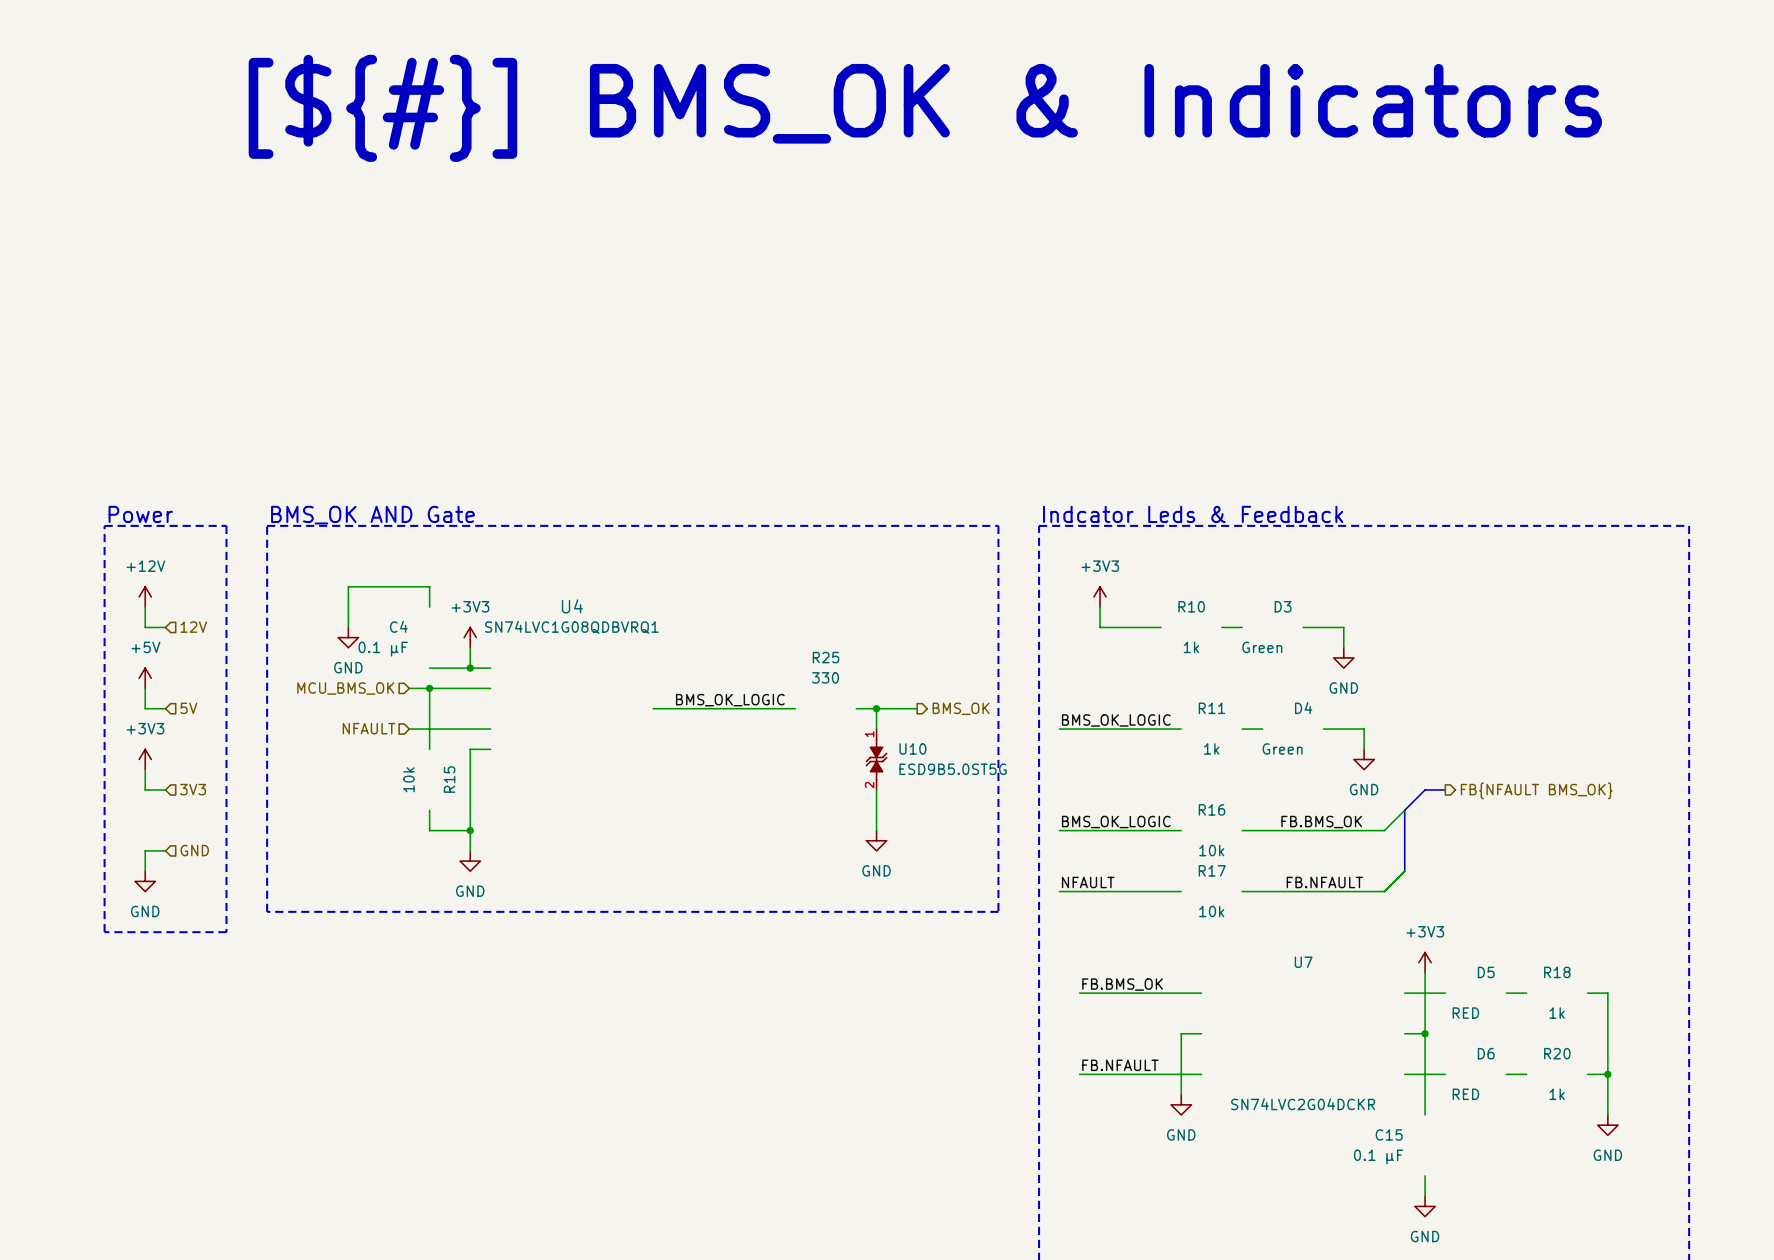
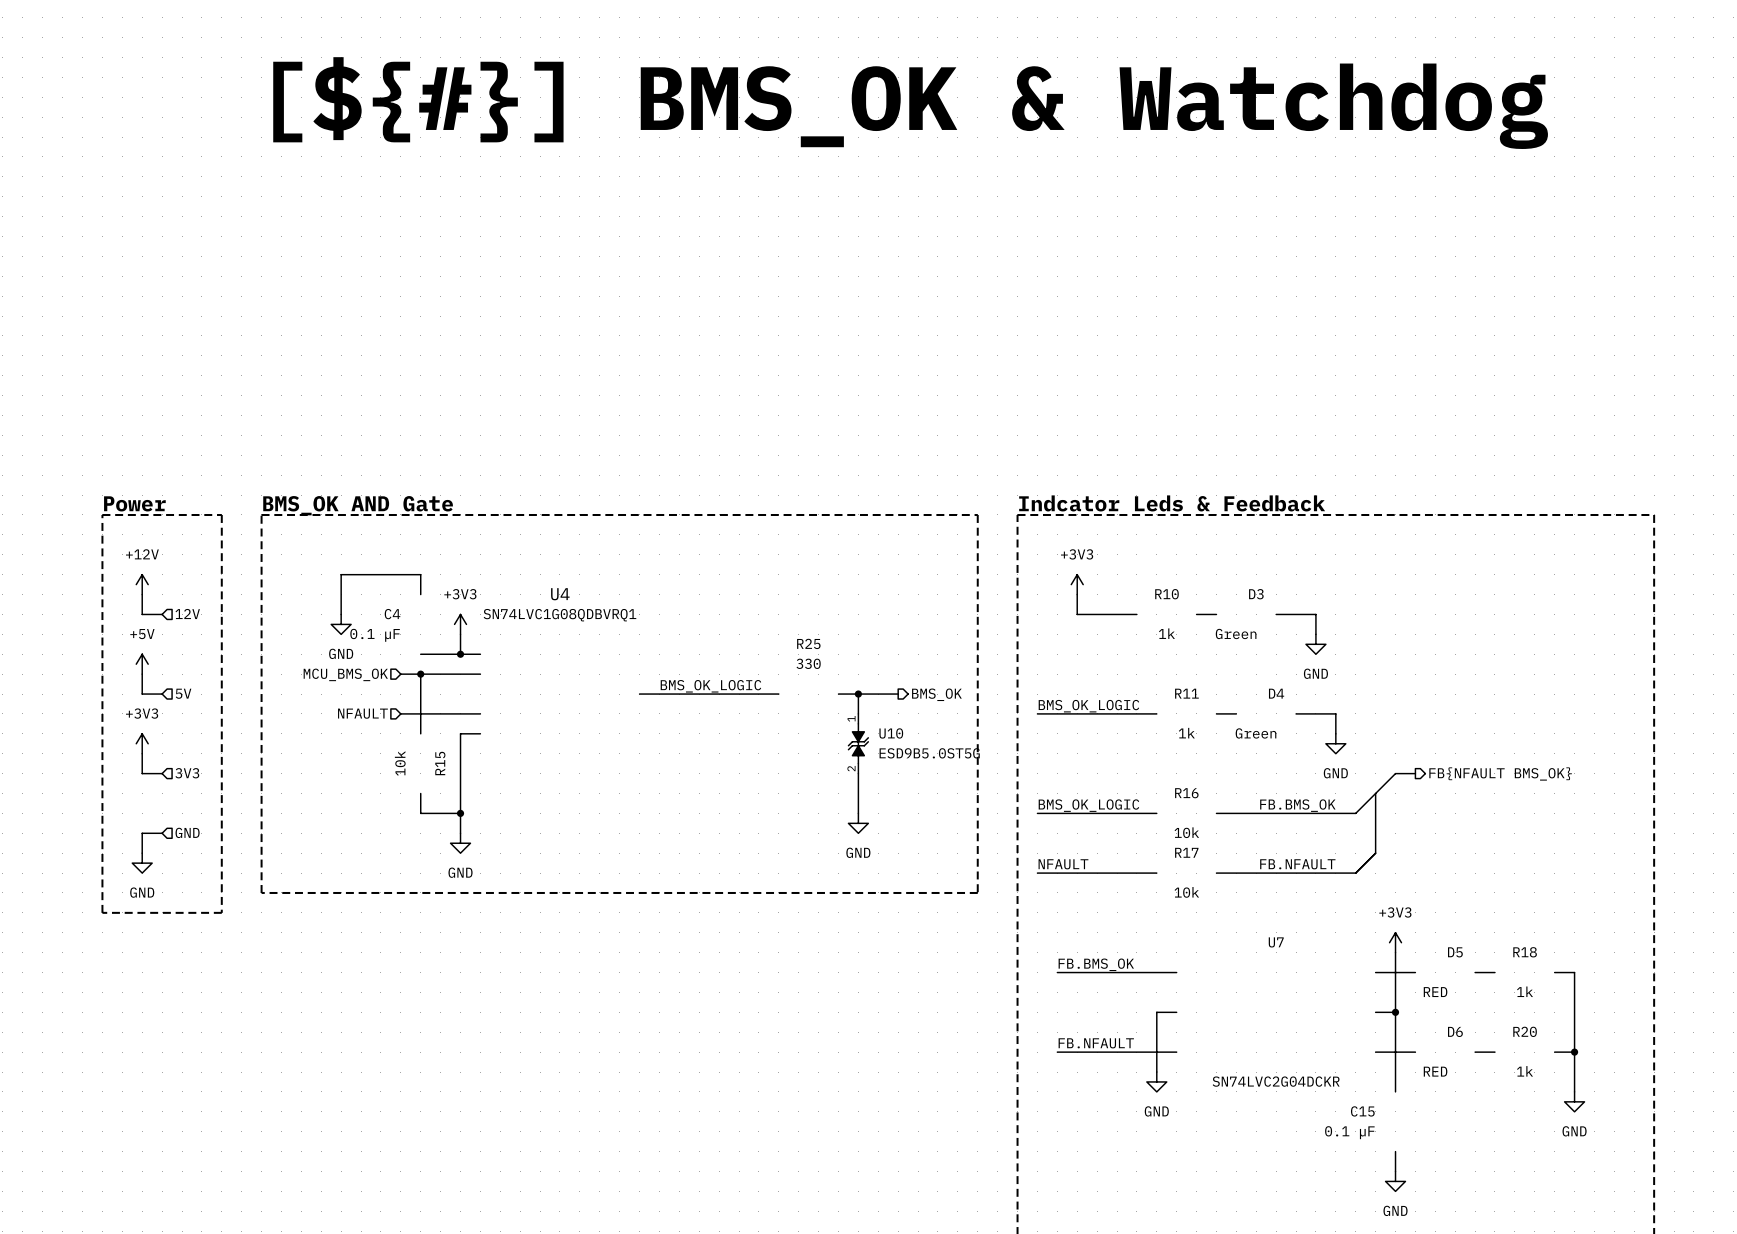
text: [${#}] BMS_OK & Indicators (925, 108) -> [${#}] BMS_OK & Watchdog (910, 103)

